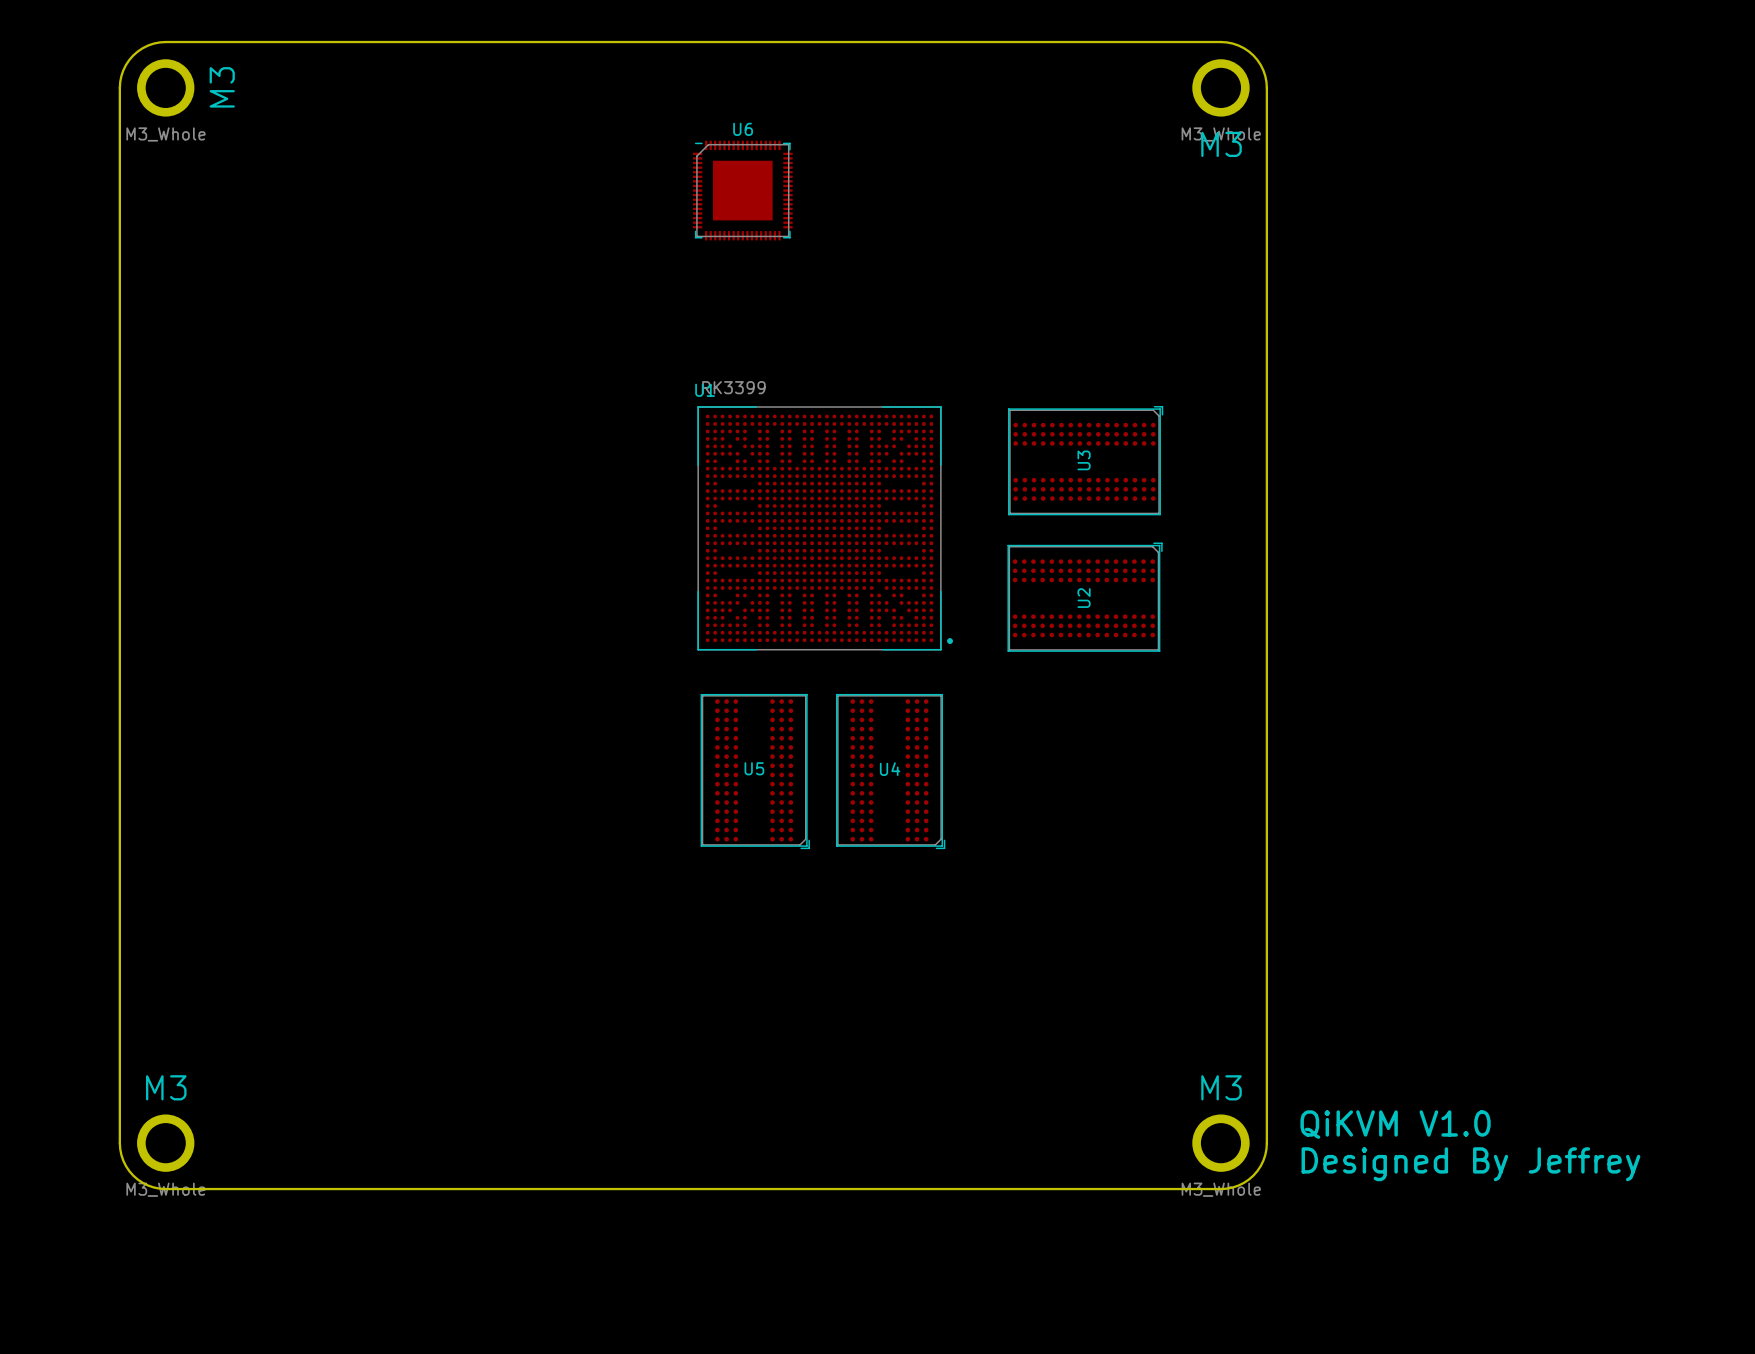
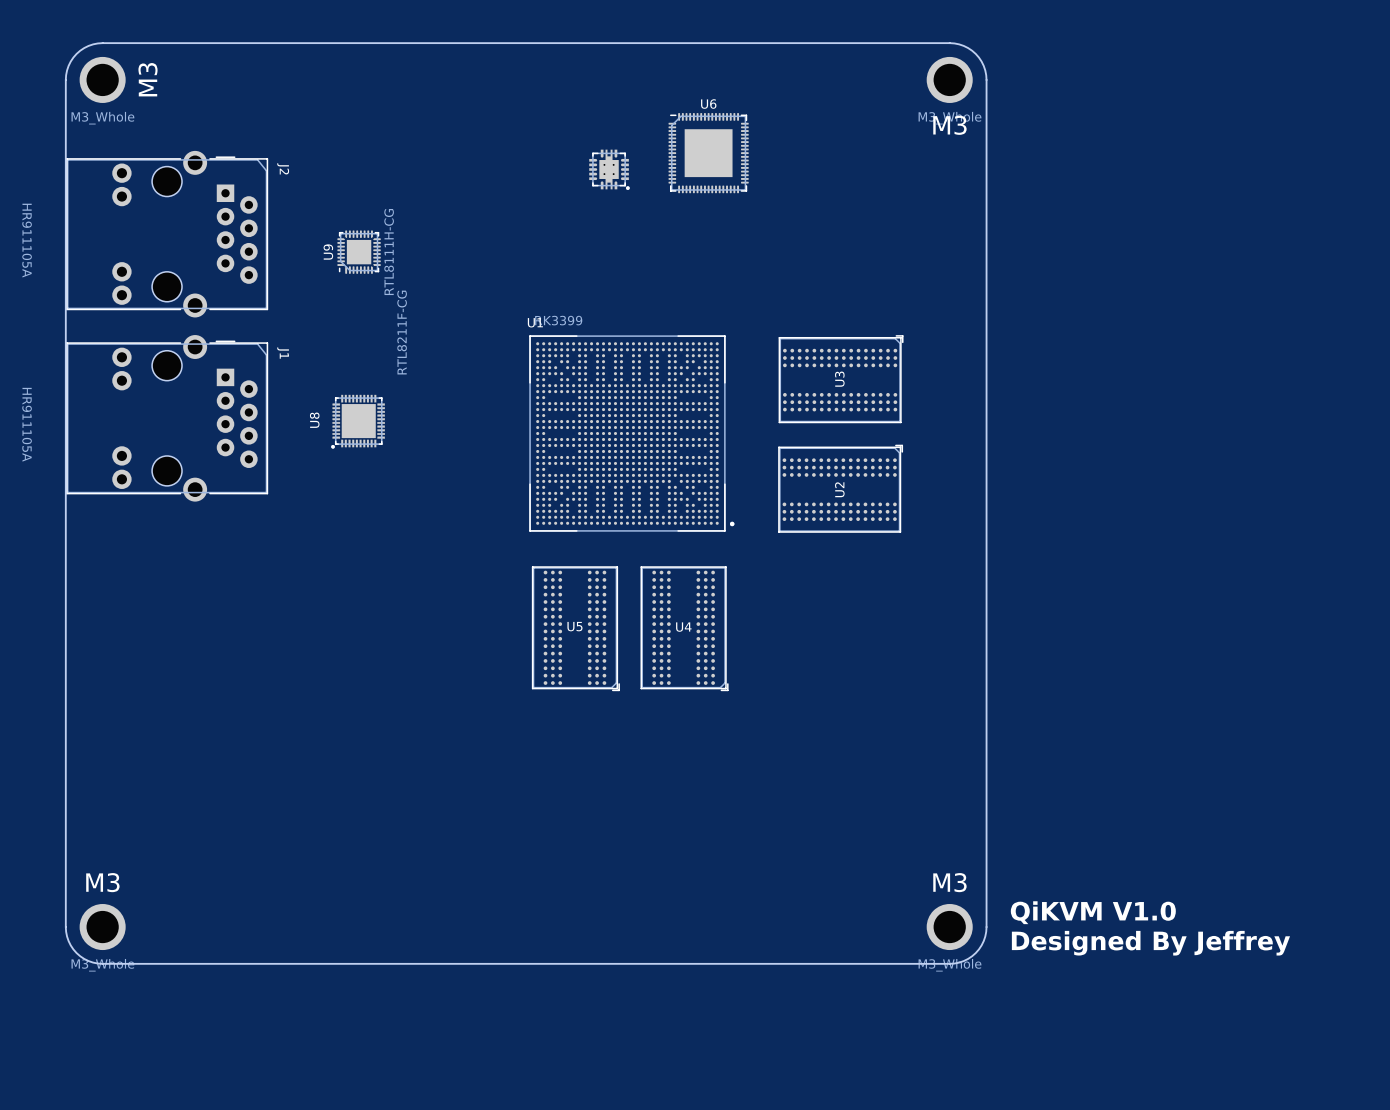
U6 position: (742, 190) -> (708, 153)
part: none -> (609, 169)
J2: none -> HR911105A (167, 234)
U9: none -> RTL8111H-CG (359, 252)
J1: none -> HR911105A (167, 418)
U8: none -> RTL8211F-CG (358, 421)

